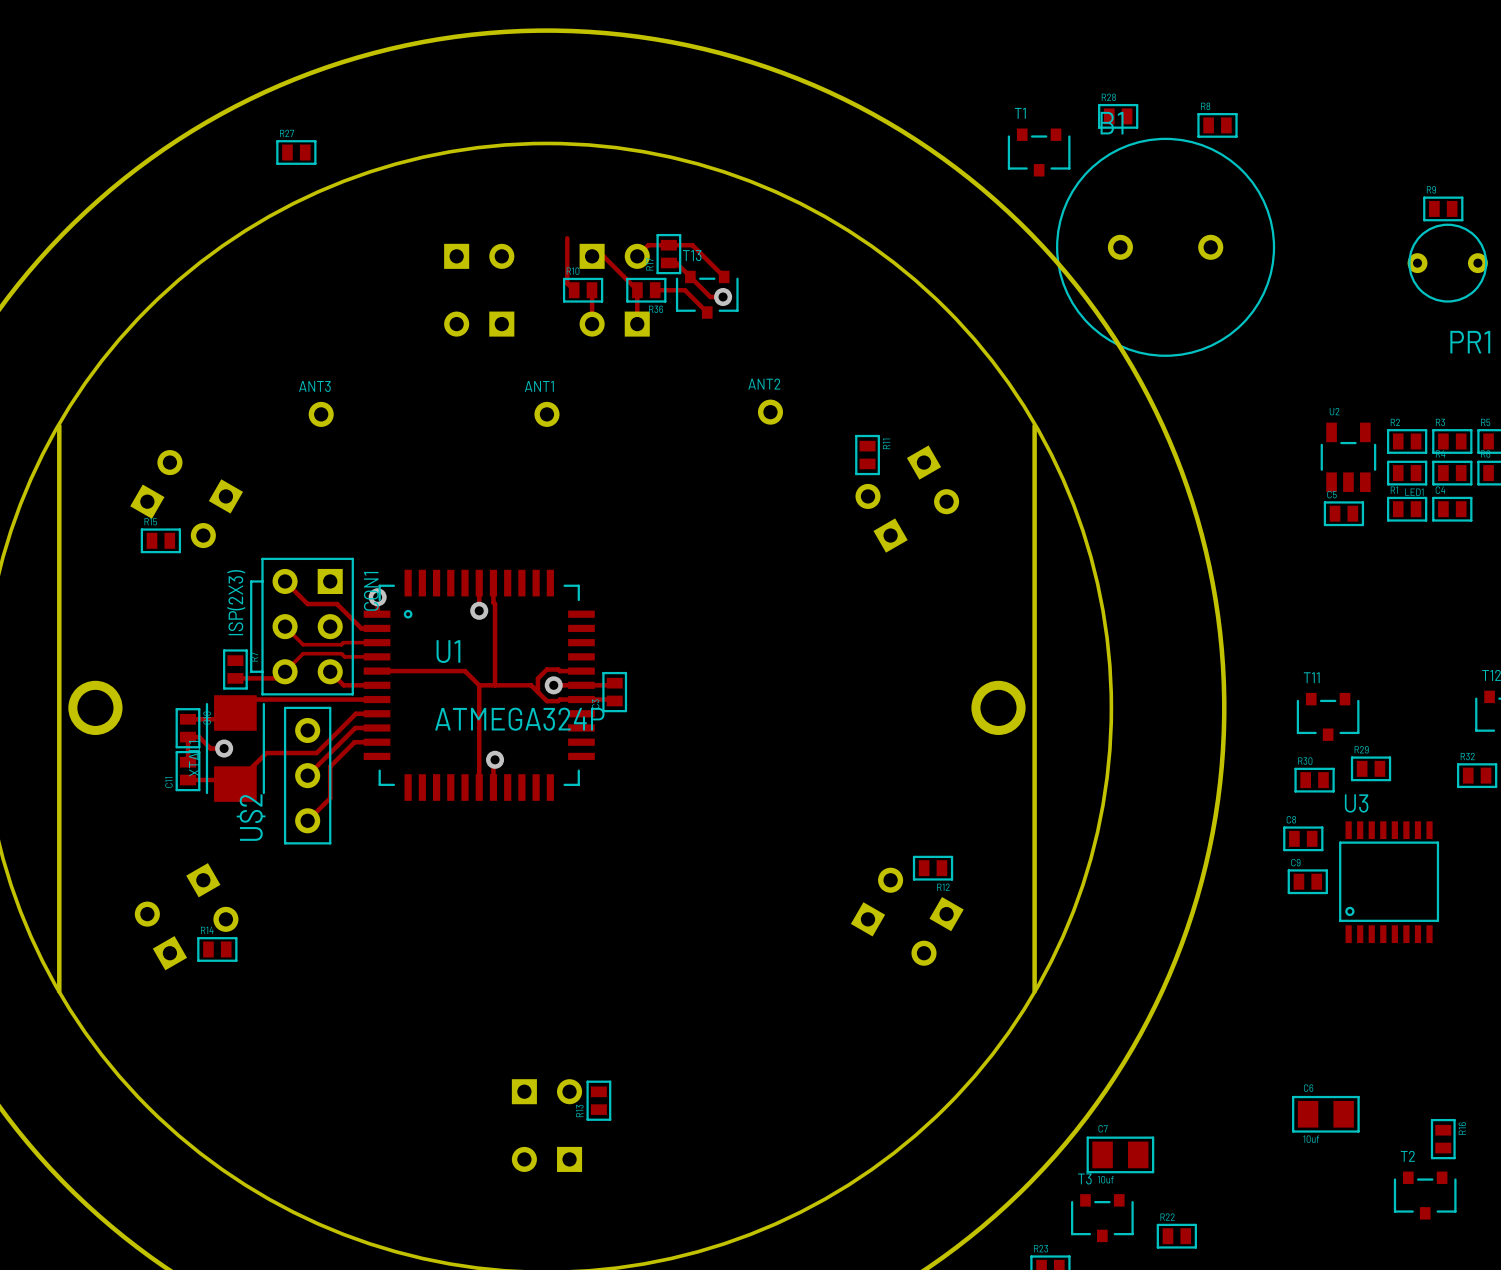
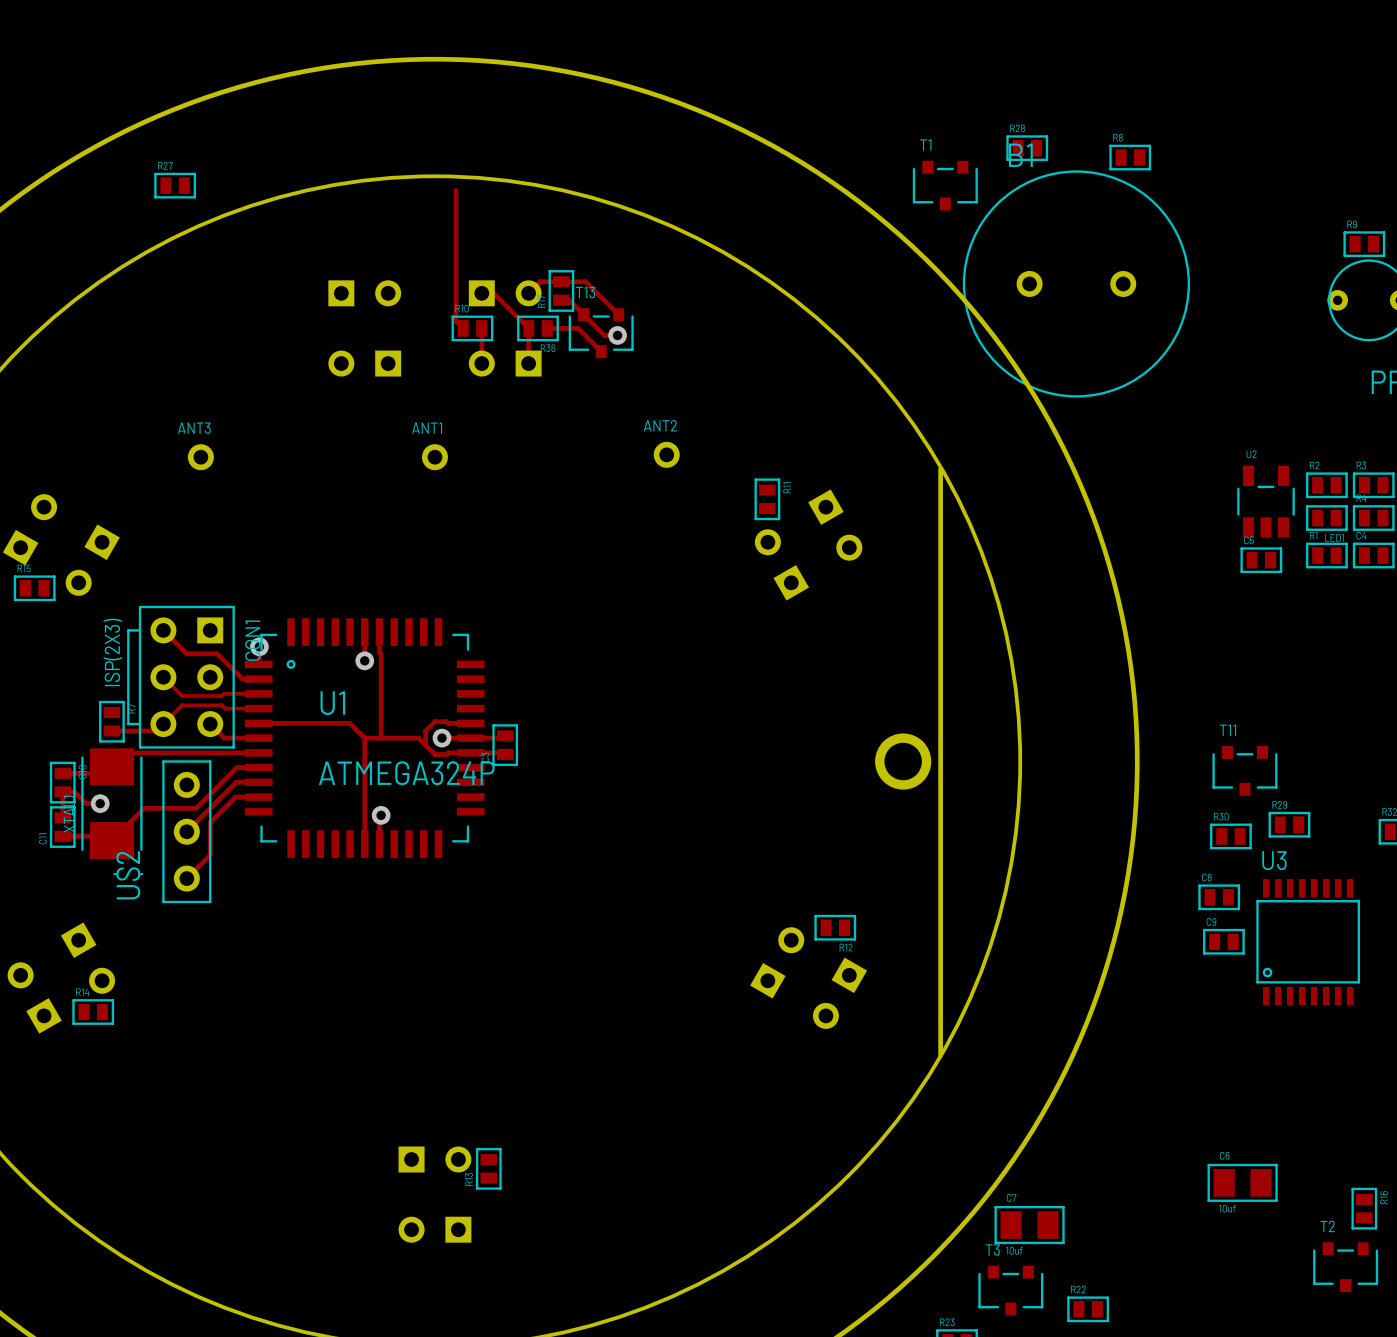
track: none -> (456, 190) (456, 274)

